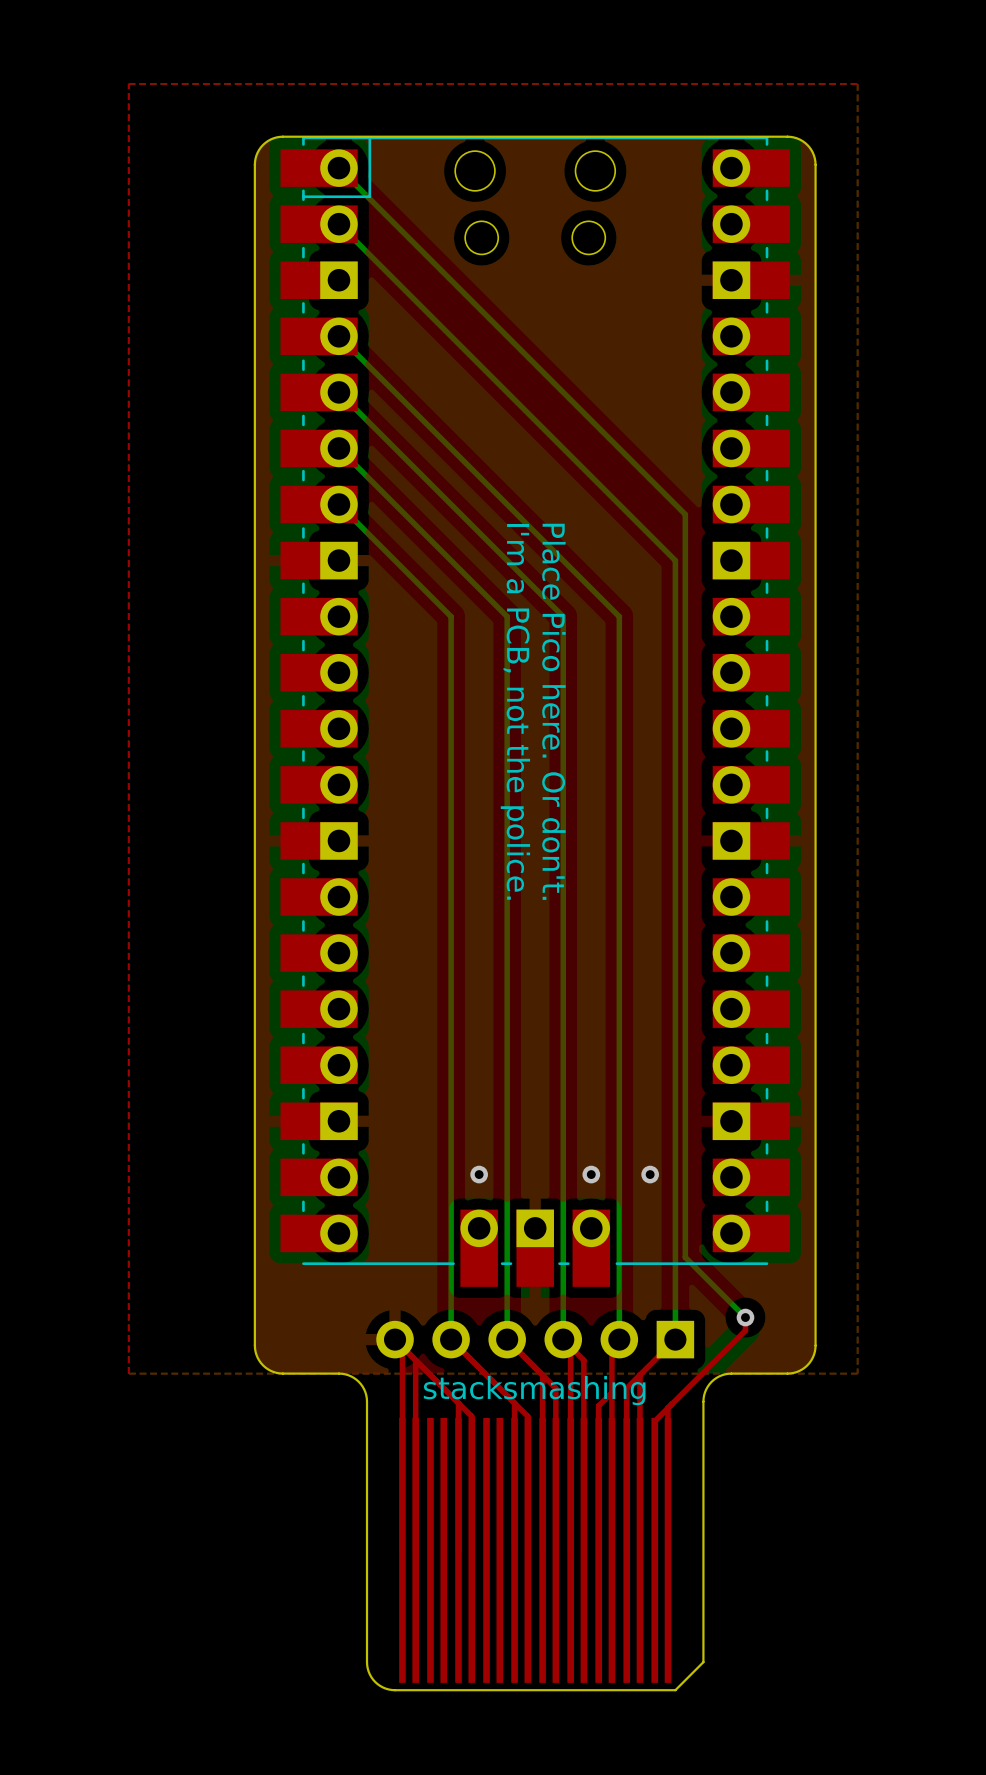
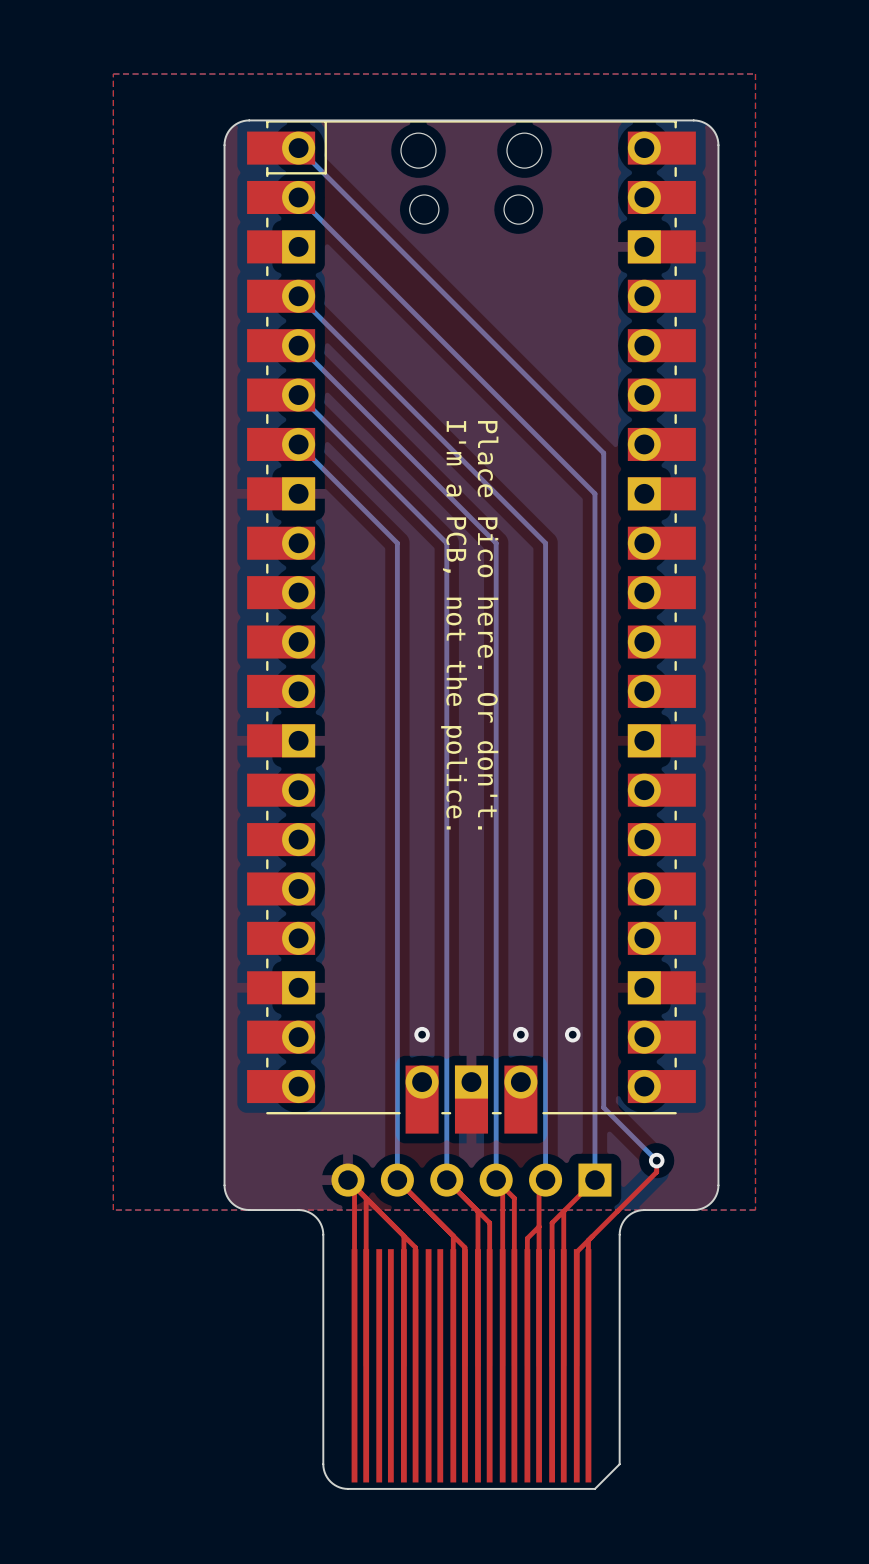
text: stacksmashing (534, 1390) -> none

